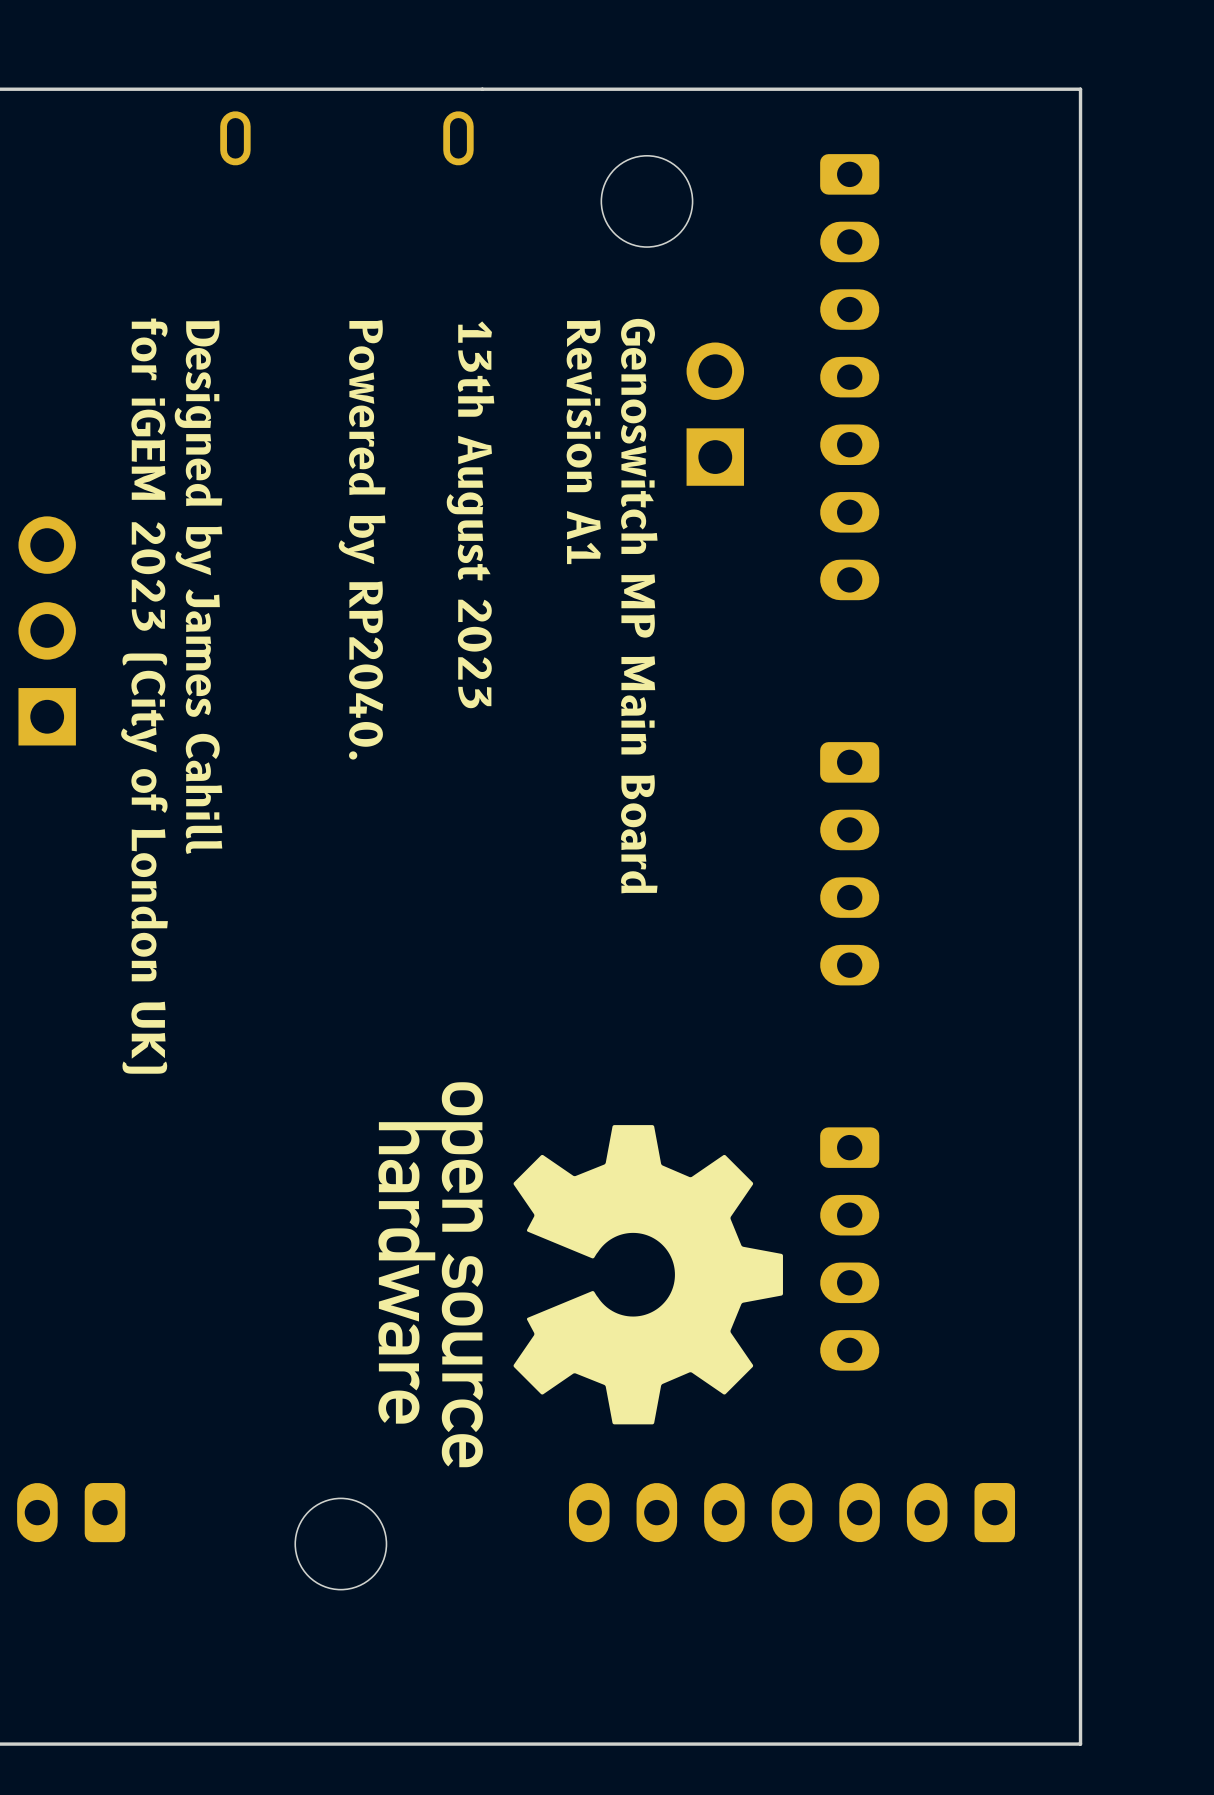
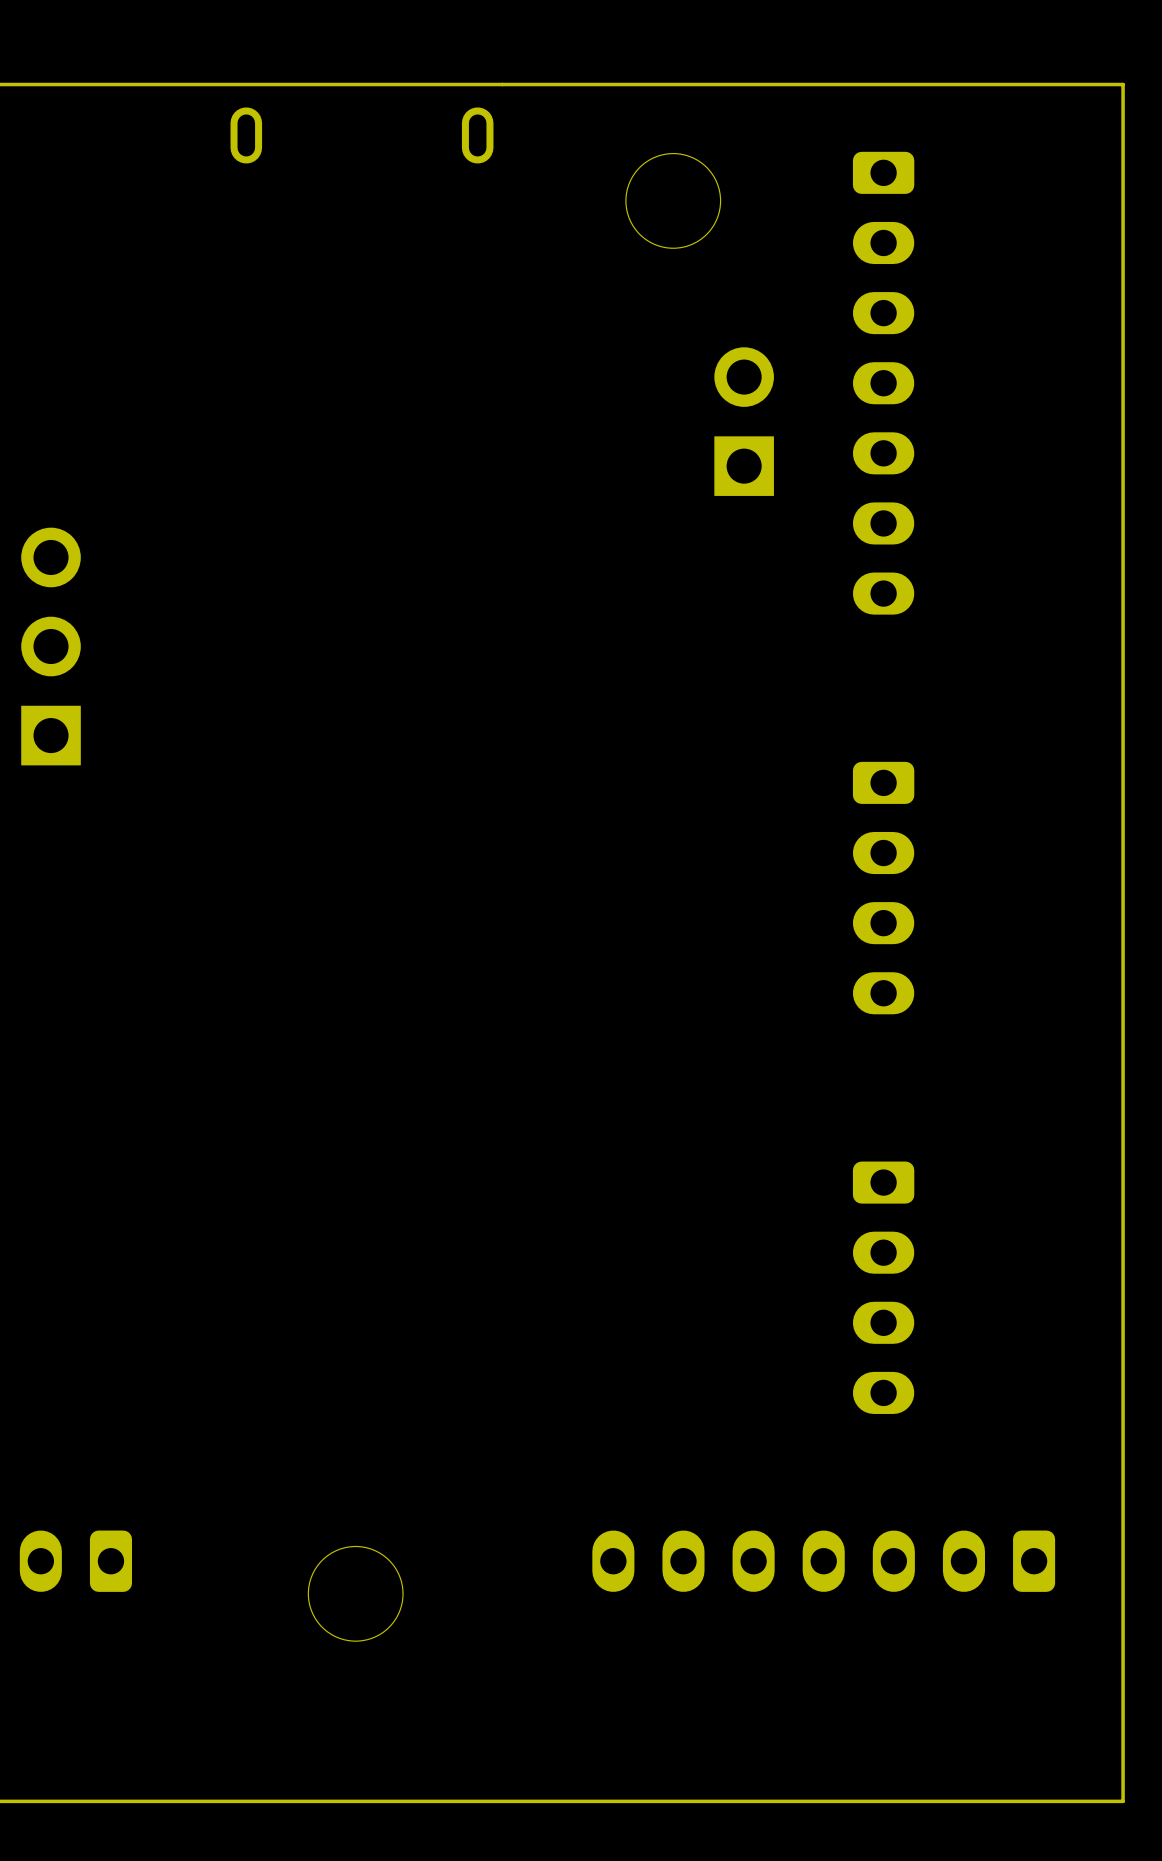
text: Revision A1 (583, 442) -> none
text: 13th August 2023 (470, 514) -> none
text: Powered by RP2040. (362, 539) -> none
text: Designed by James Cahill (198, 587) -> none
text: Genoswitch MP Main Board (639, 606) -> none
text: for iGEM 2023 (City of London UK) (144, 696) -> none
drawing: [378, 1082, 783, 1468] -> none

